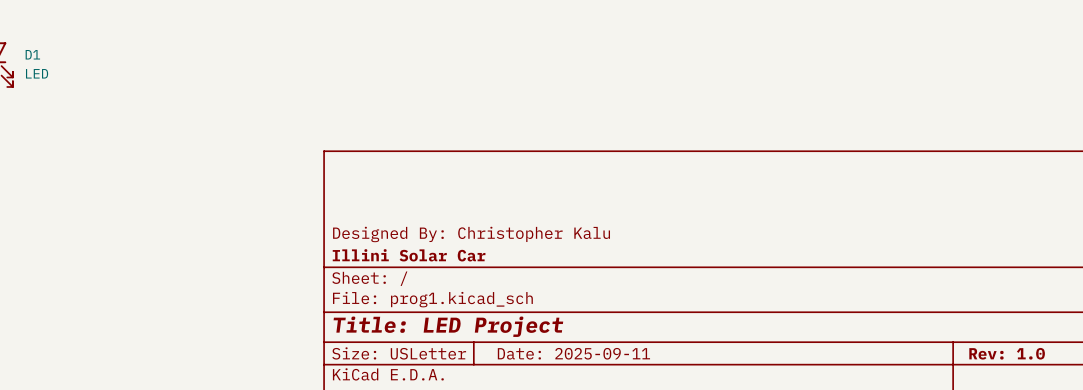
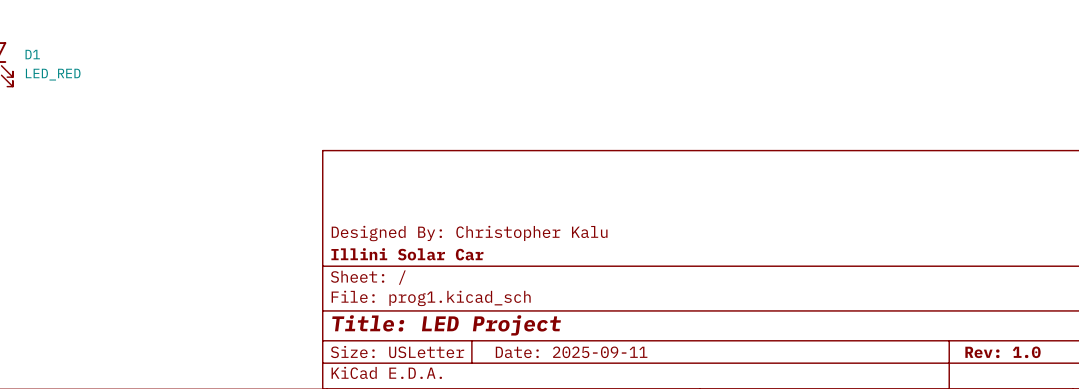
D1 value: LED (37, 73) -> LED_RED (53, 74)

